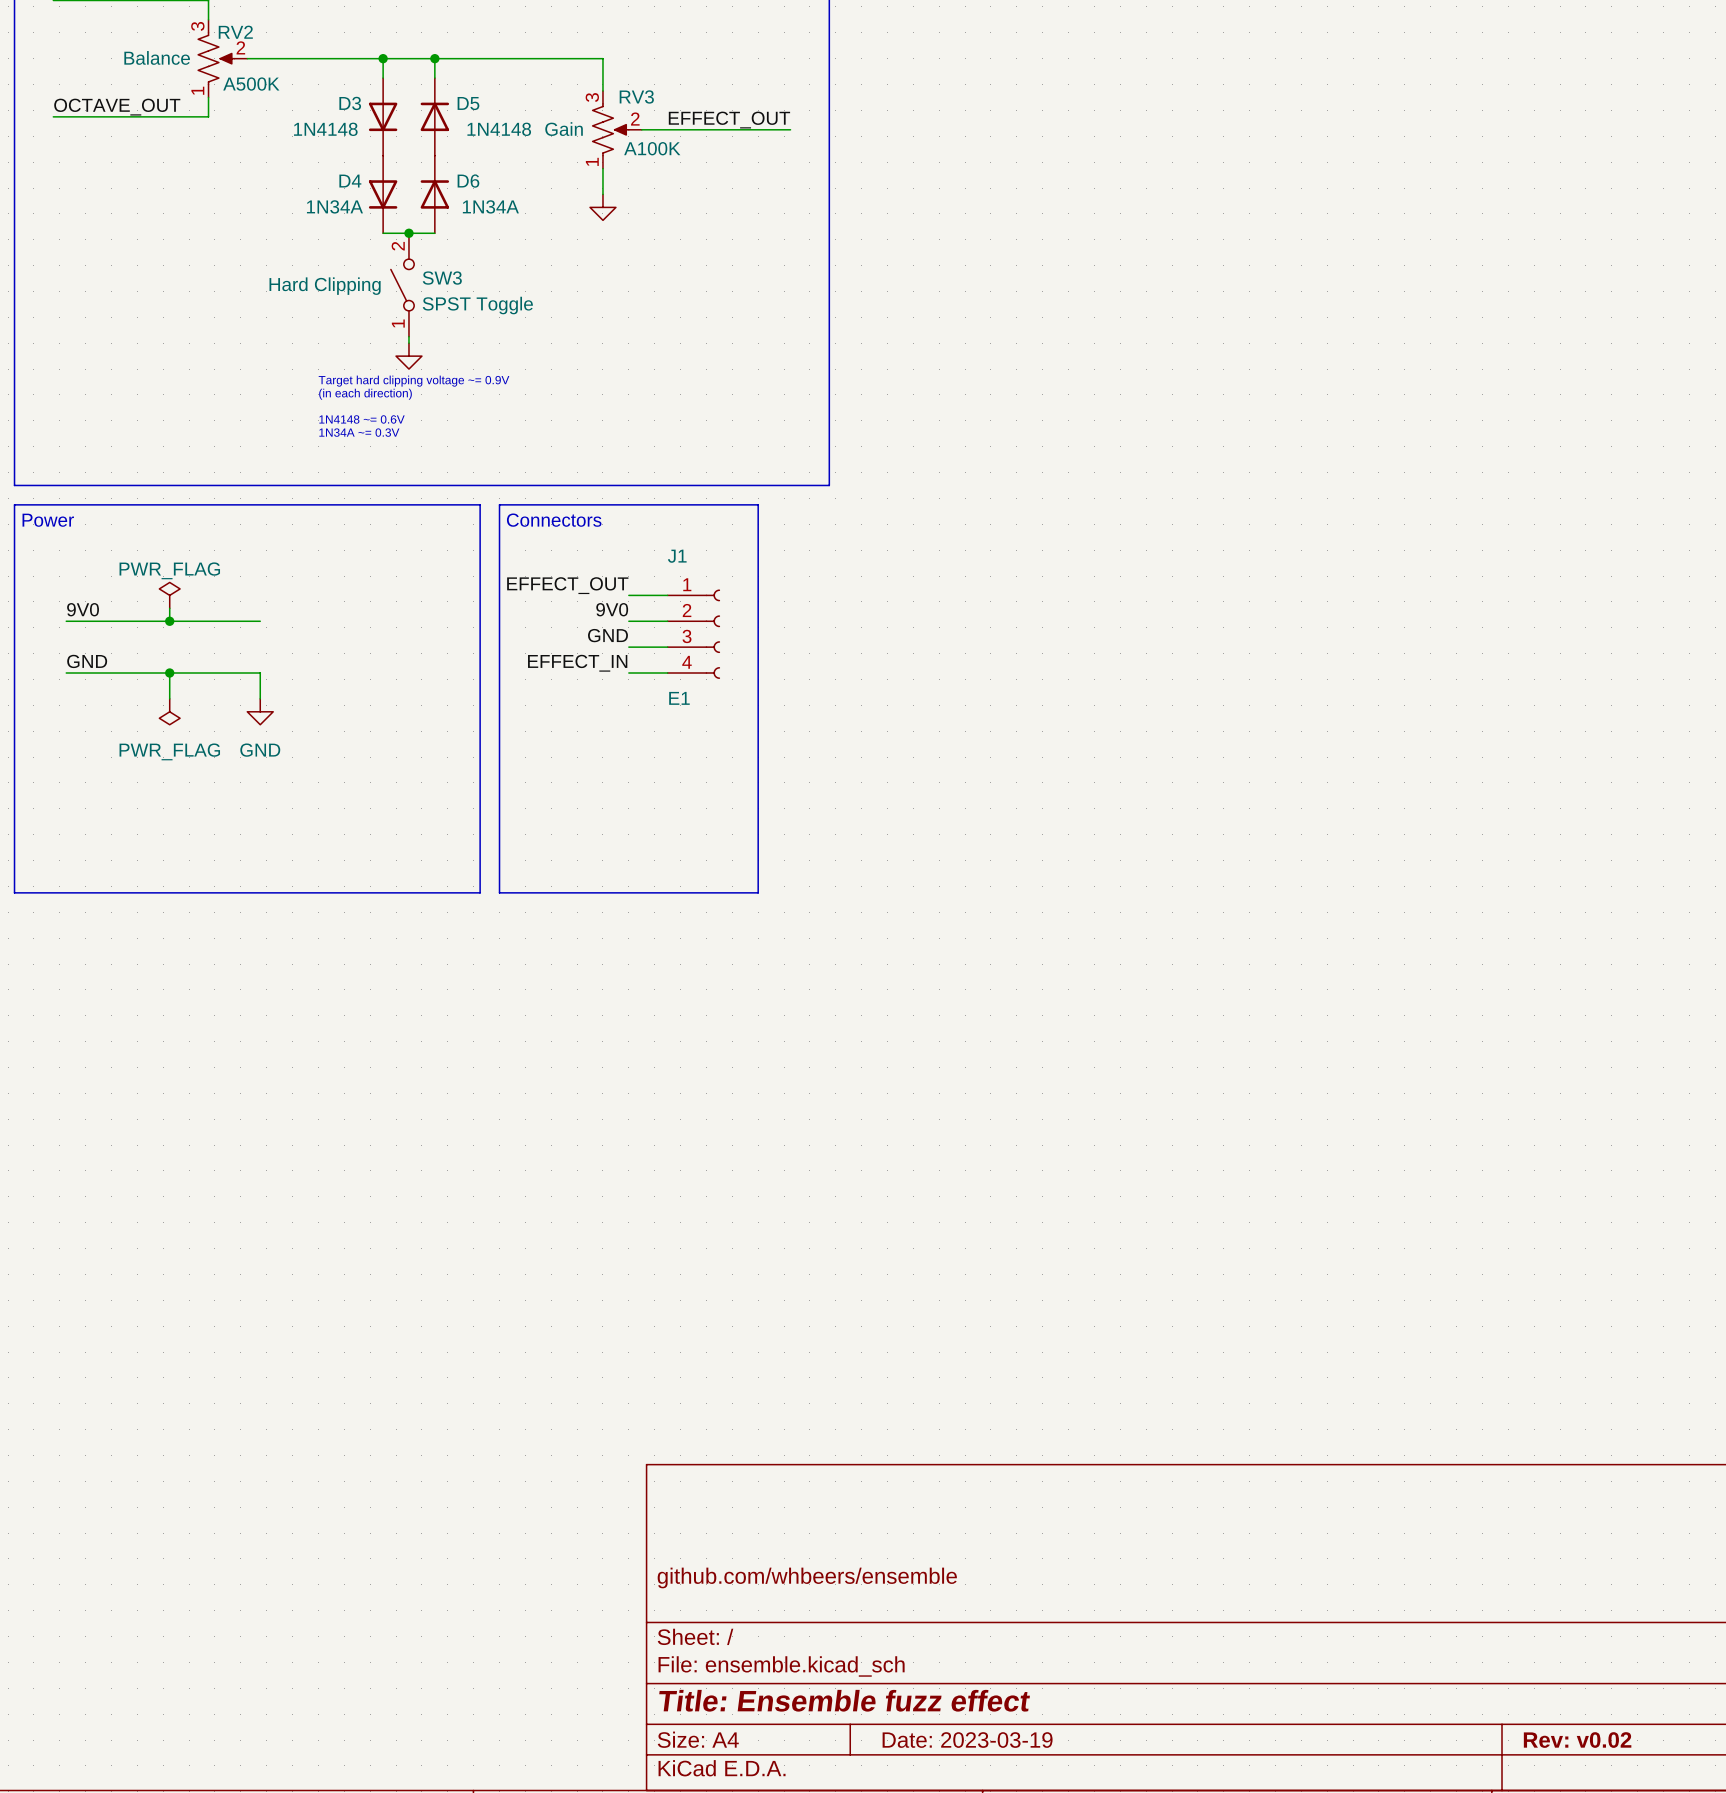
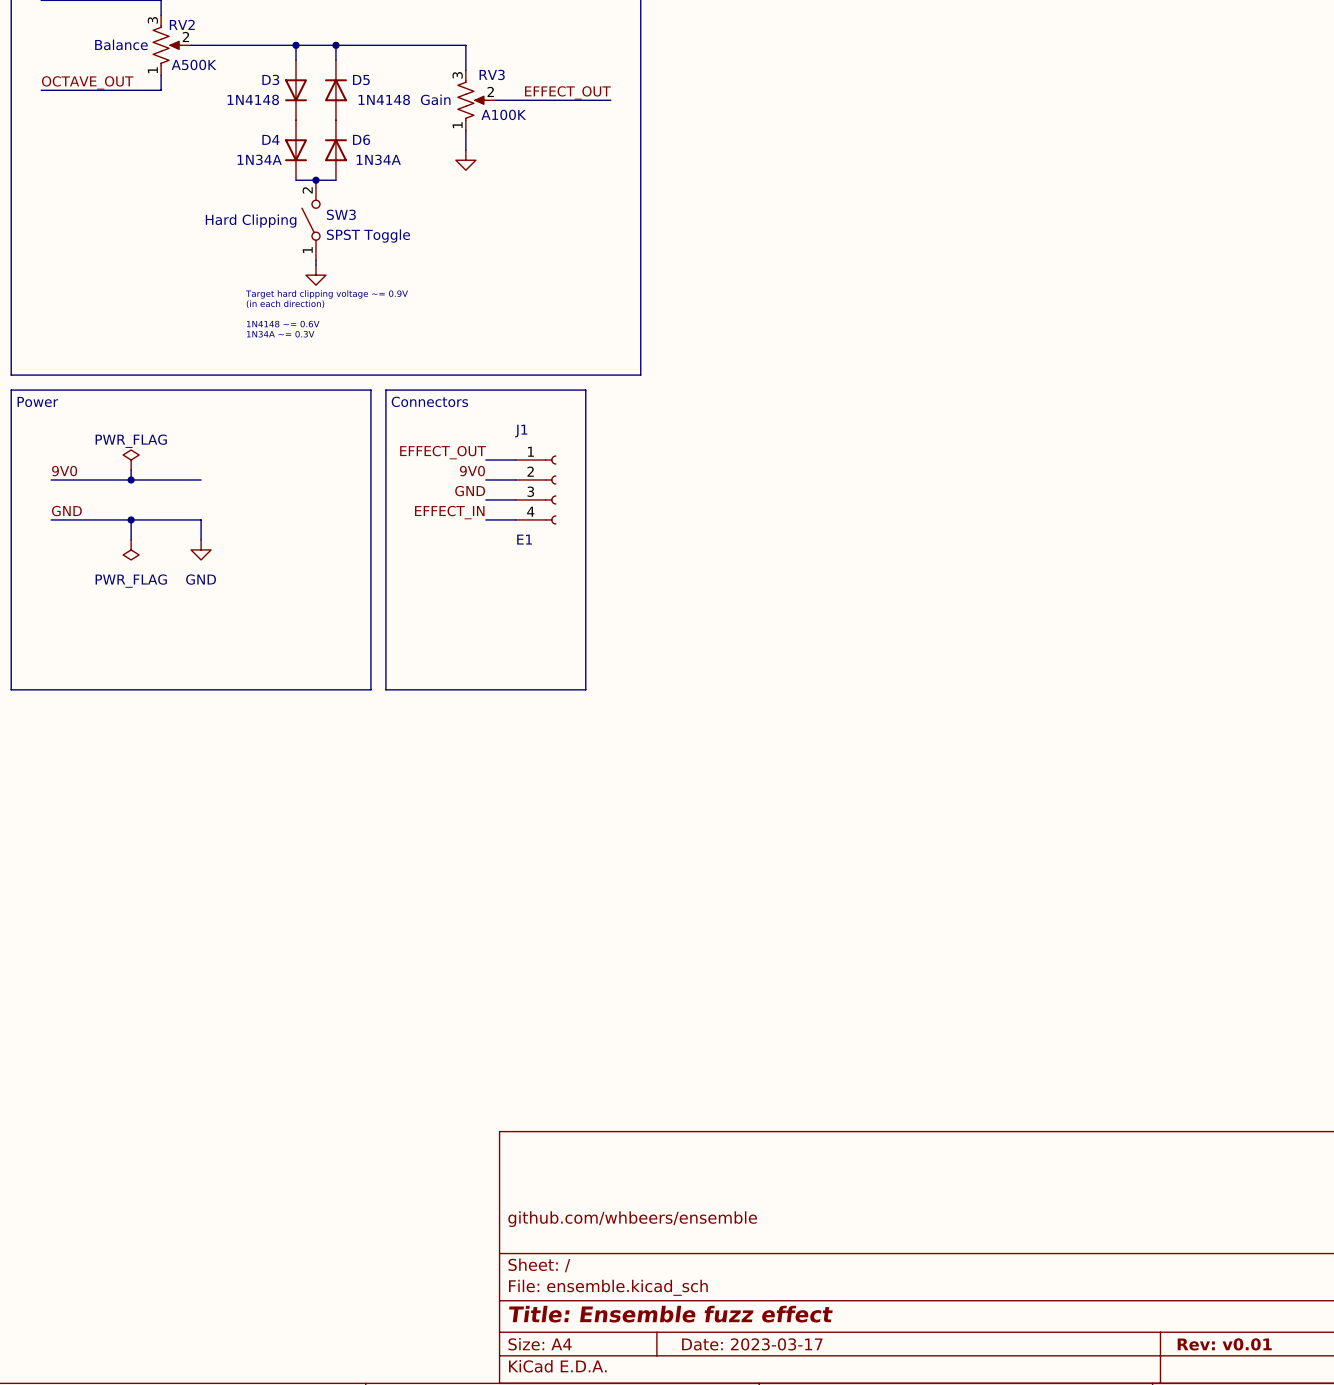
title block: Date: 2023-03-19 (967, 1740) -> Date: 2023-03-17 (752, 1344)
title block: Rev: v0.02 (1577, 1740) -> Rev: v0.01 (1224, 1344)

